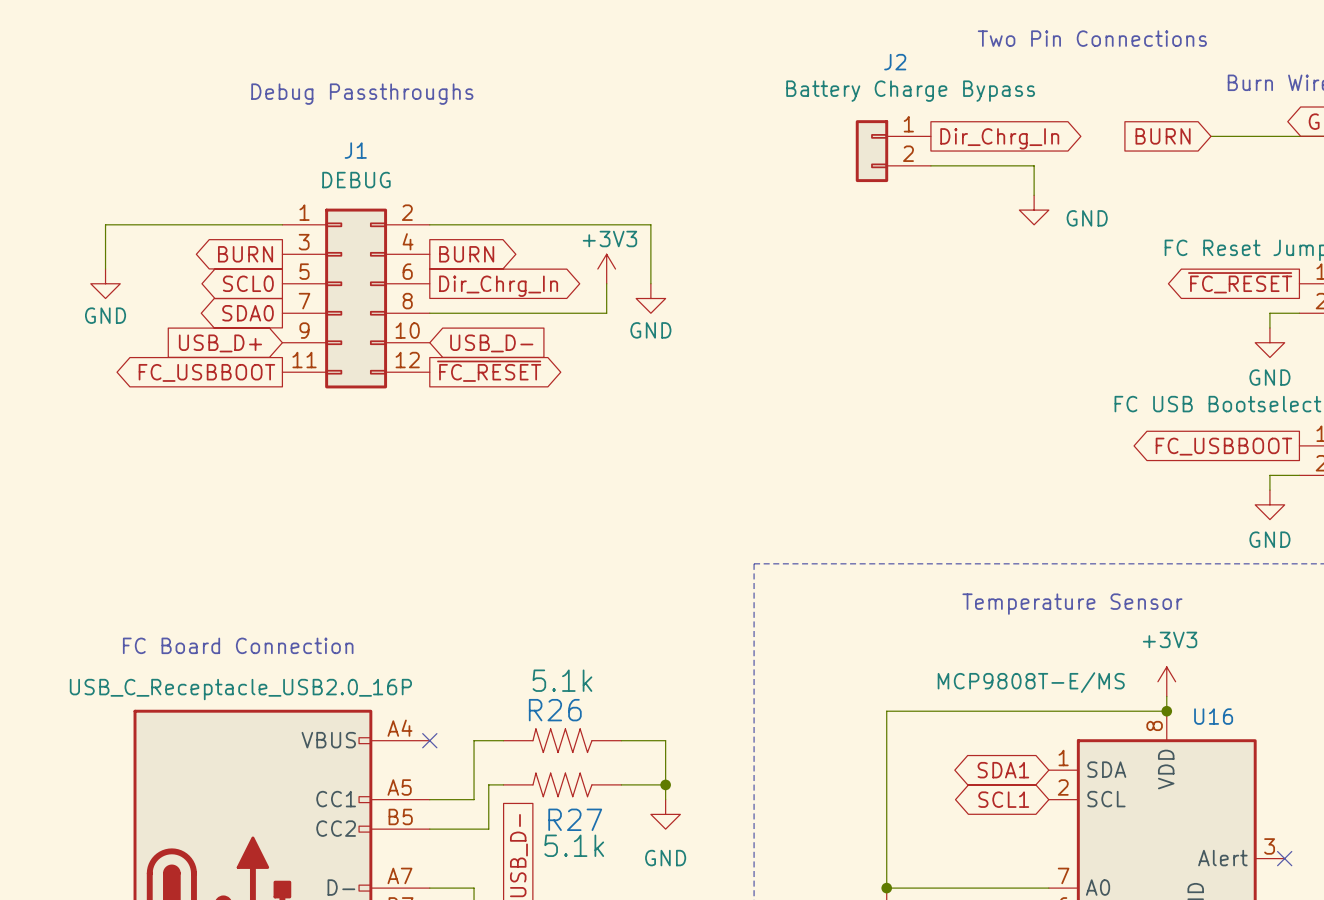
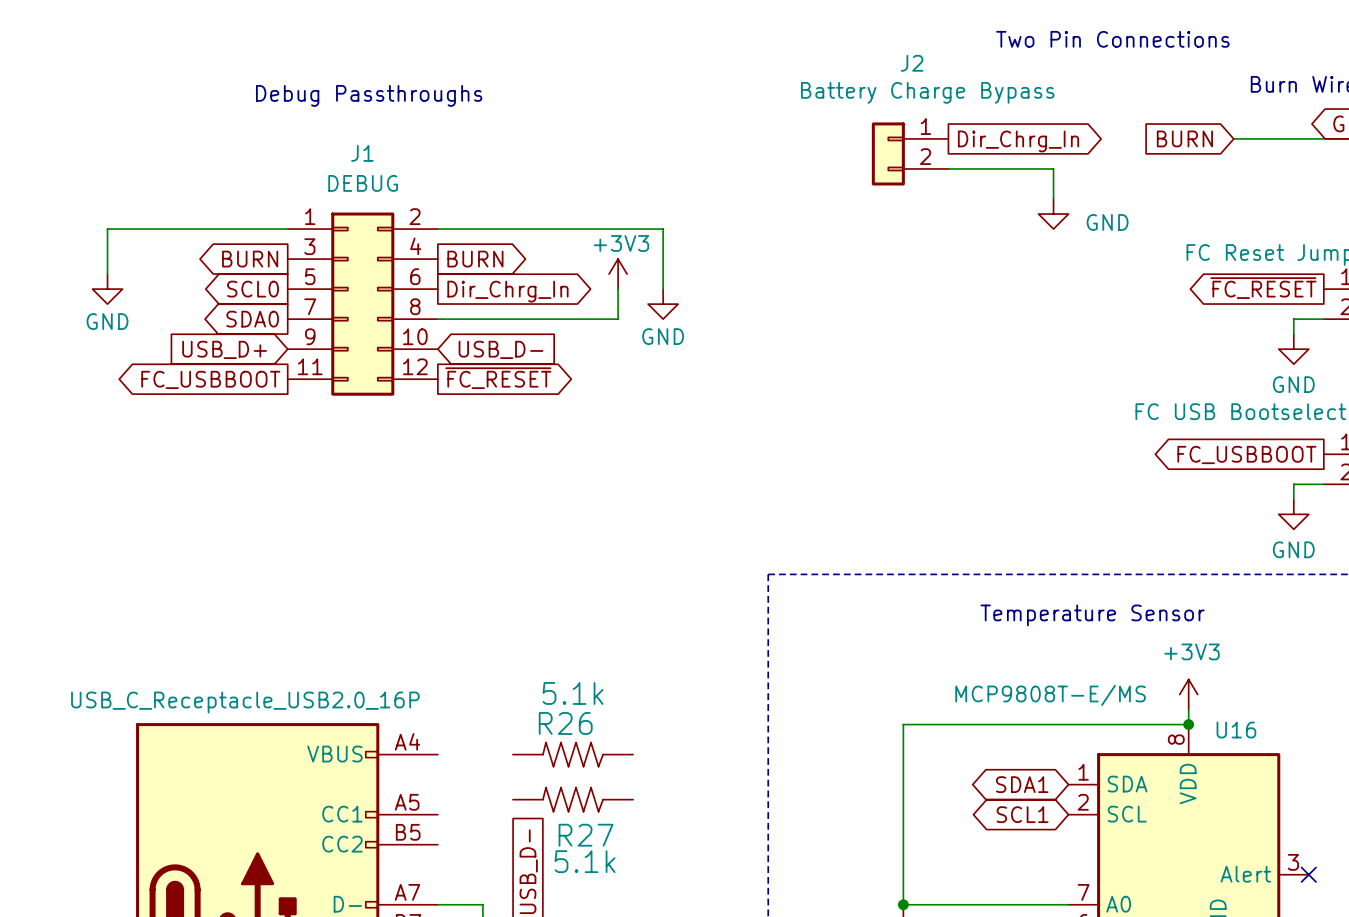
text: FC Board Connection (238, 645) -> none
no-connect mark: (429, 740) -> none
wire: (503, 740) (474, 740) (474, 799) (429, 799) -> none
wire: (621, 740) (665, 740) (665, 799) -> none
wire: (503, 784) (488, 784) (488, 829) (429, 829) -> none
wire: (621, 784) (665, 784) -> none
junction: (665, 784) -> none
power symbol: GND (665, 814) -> none

